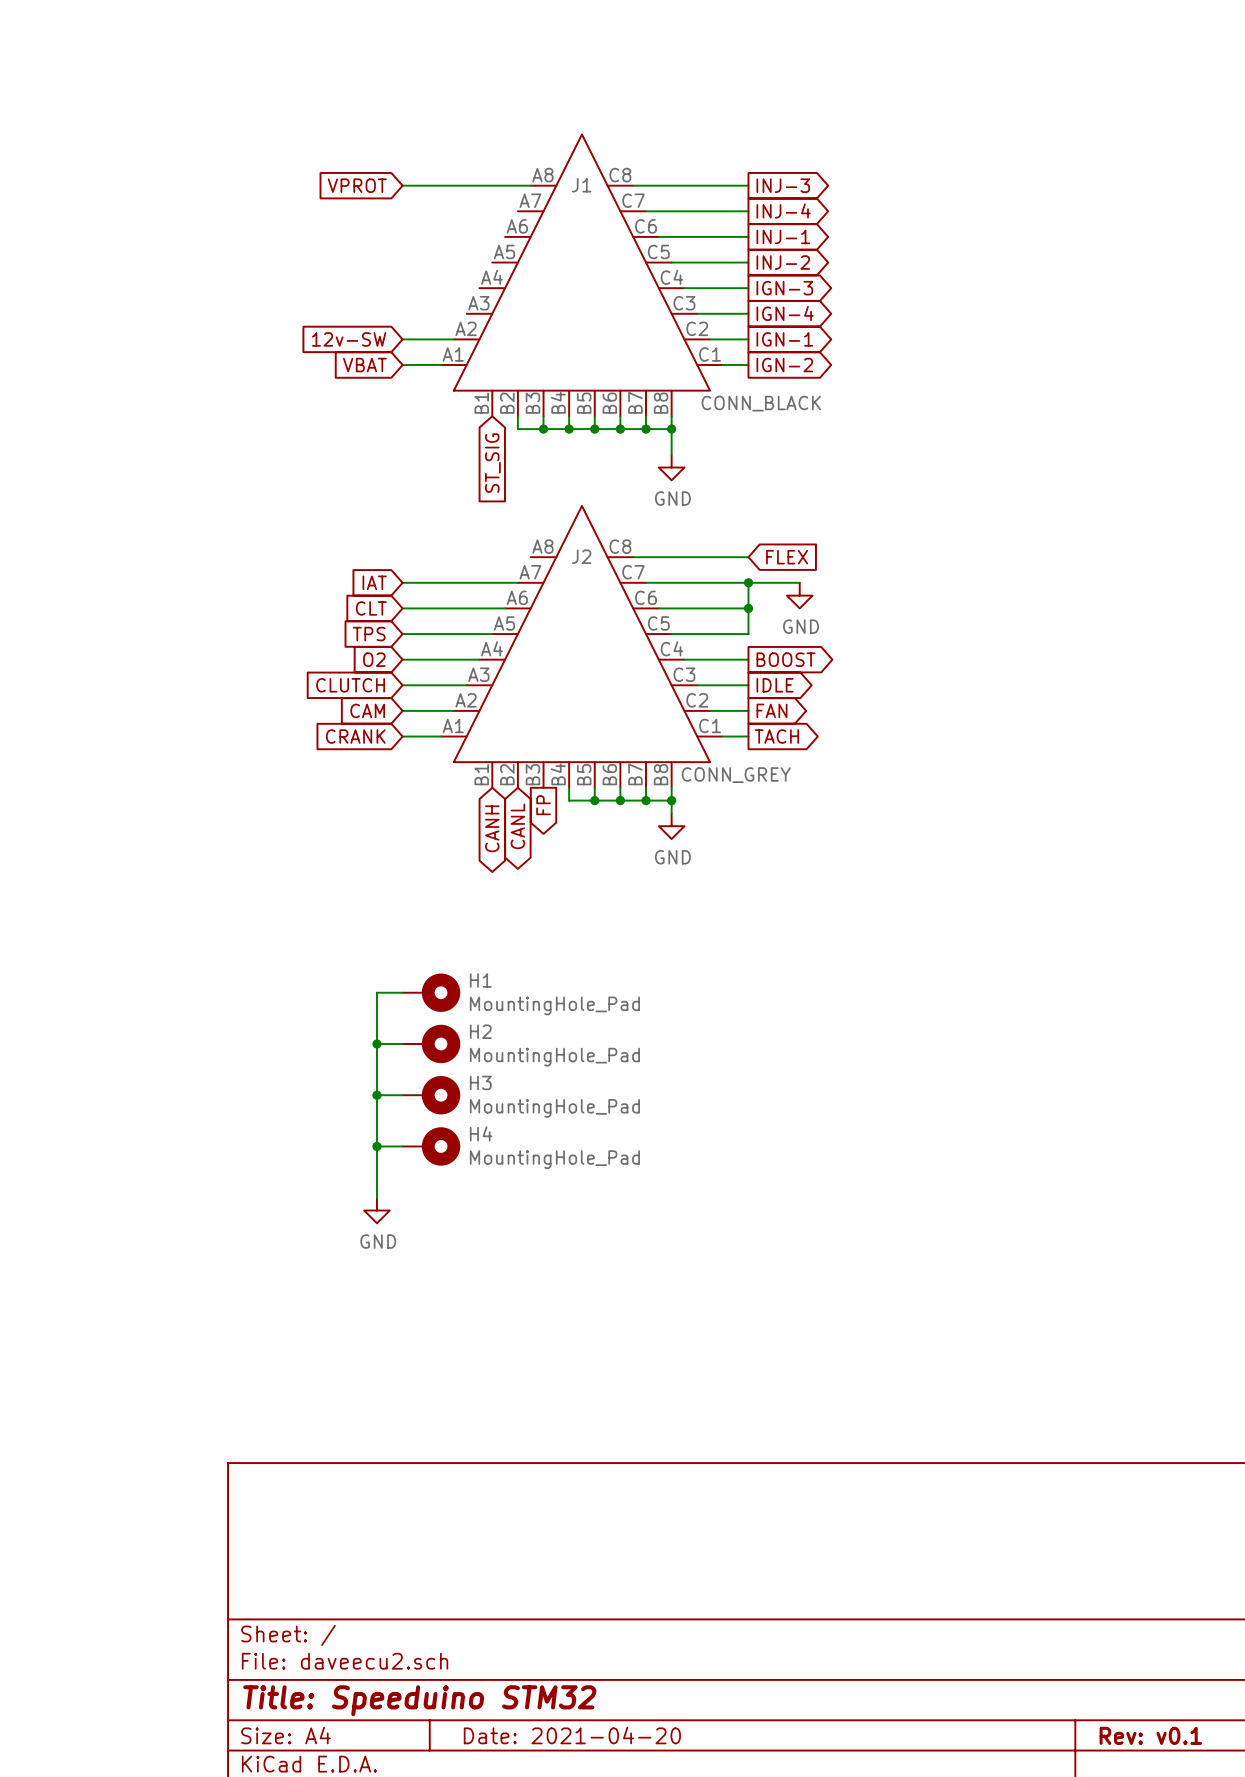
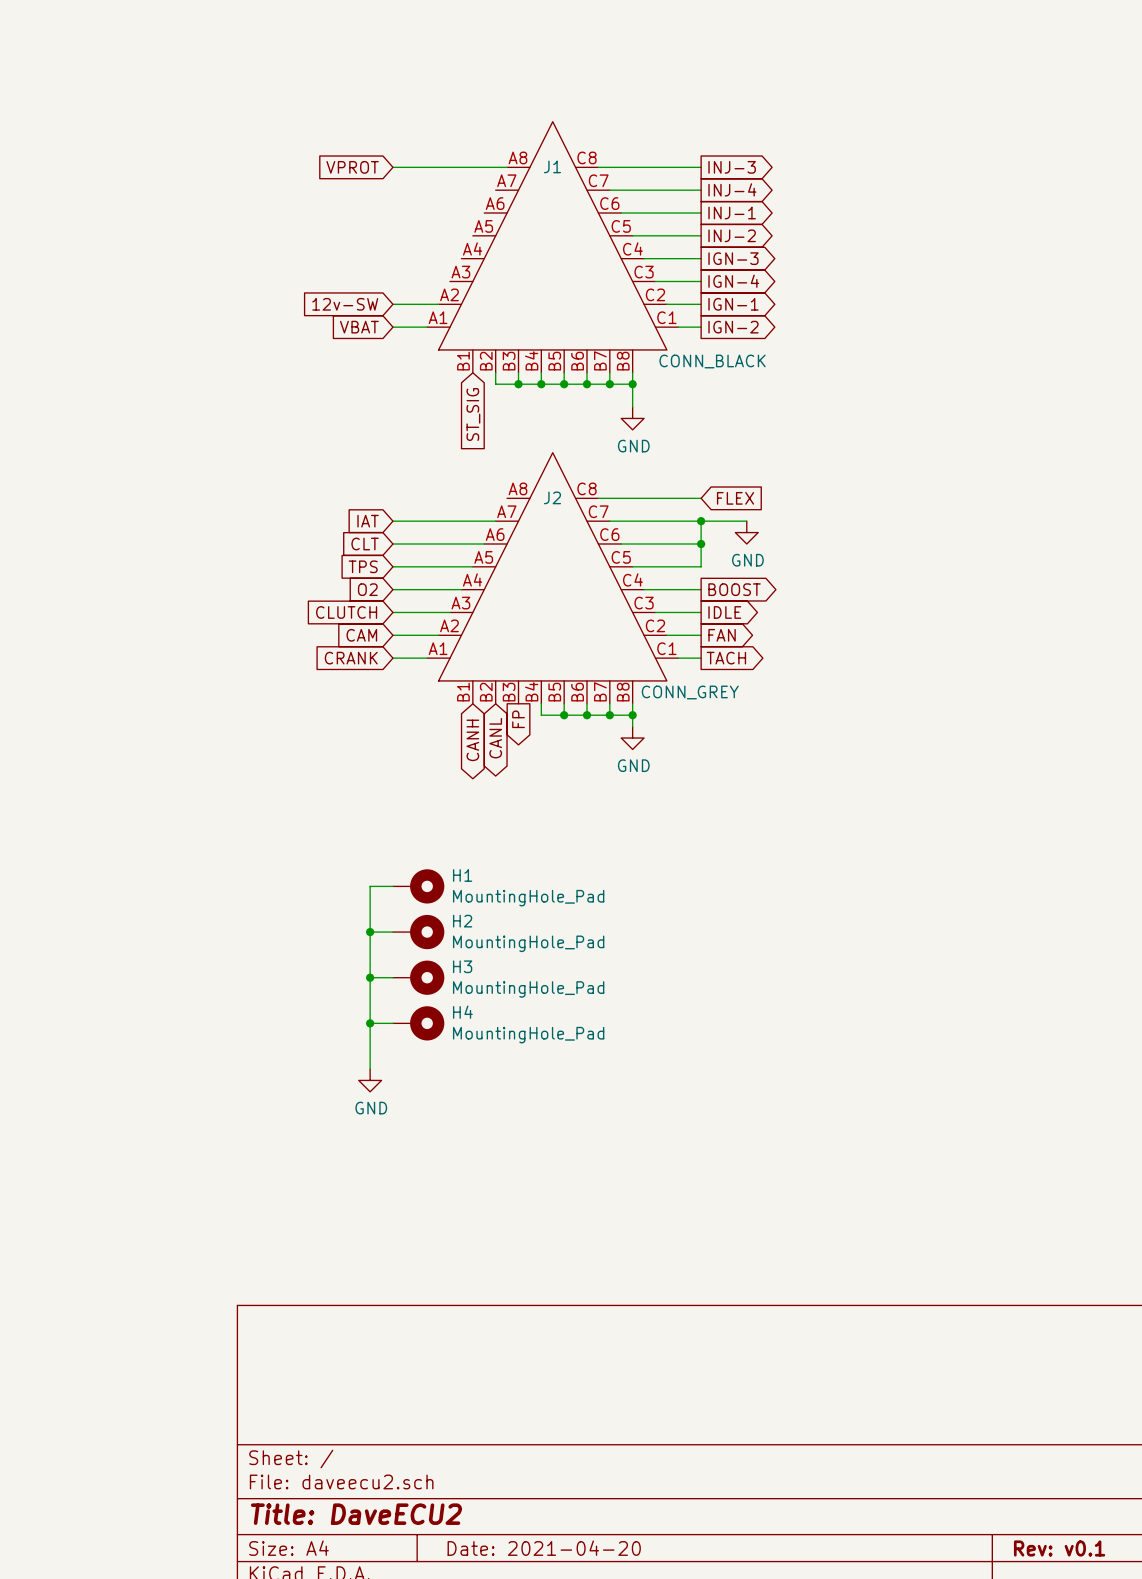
title block: Title: Speeduino STM32 (419, 1700) -> Title: DaveECU2 (356, 1514)

